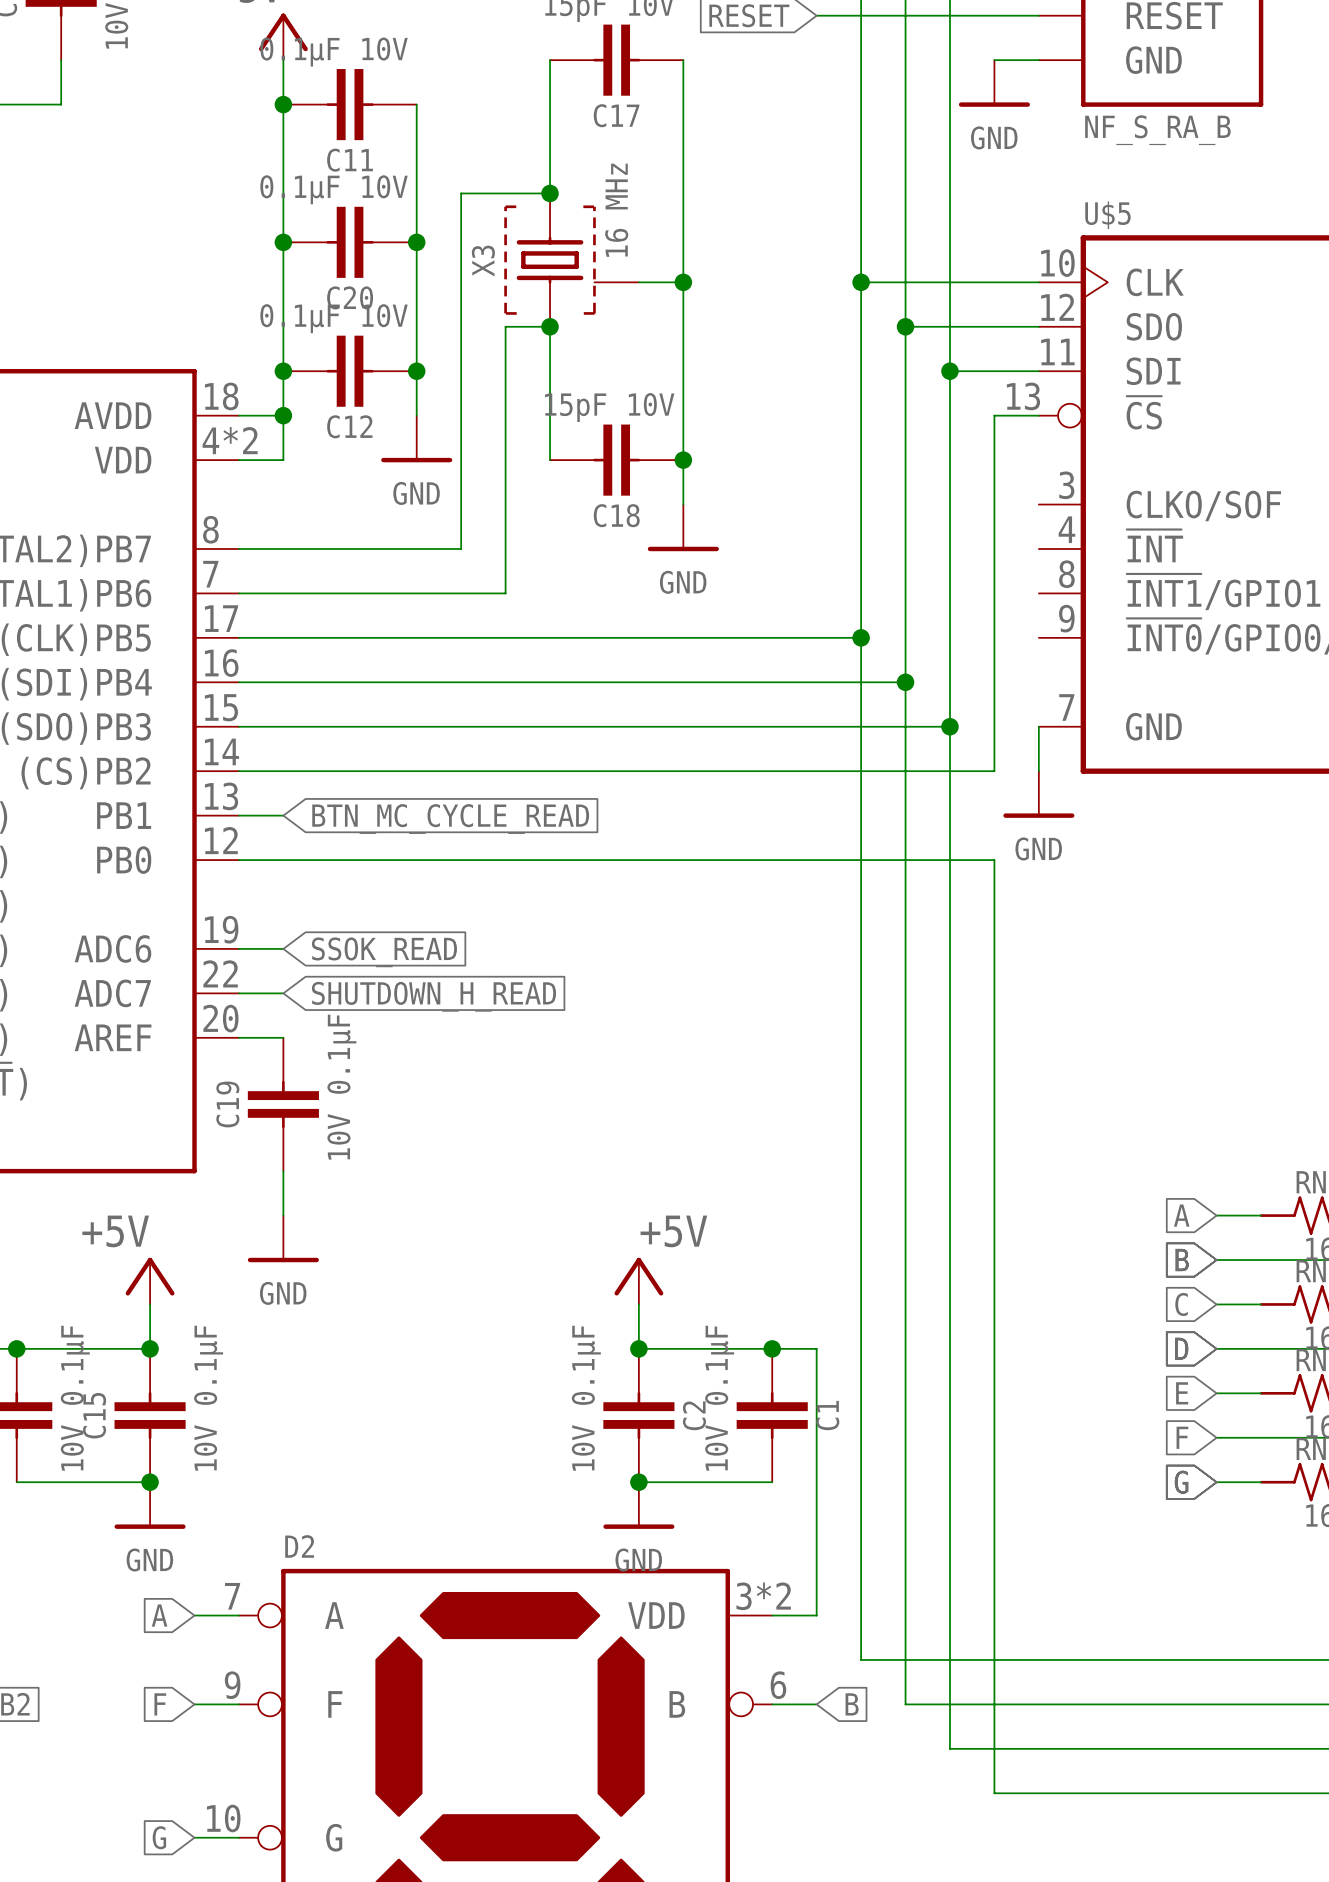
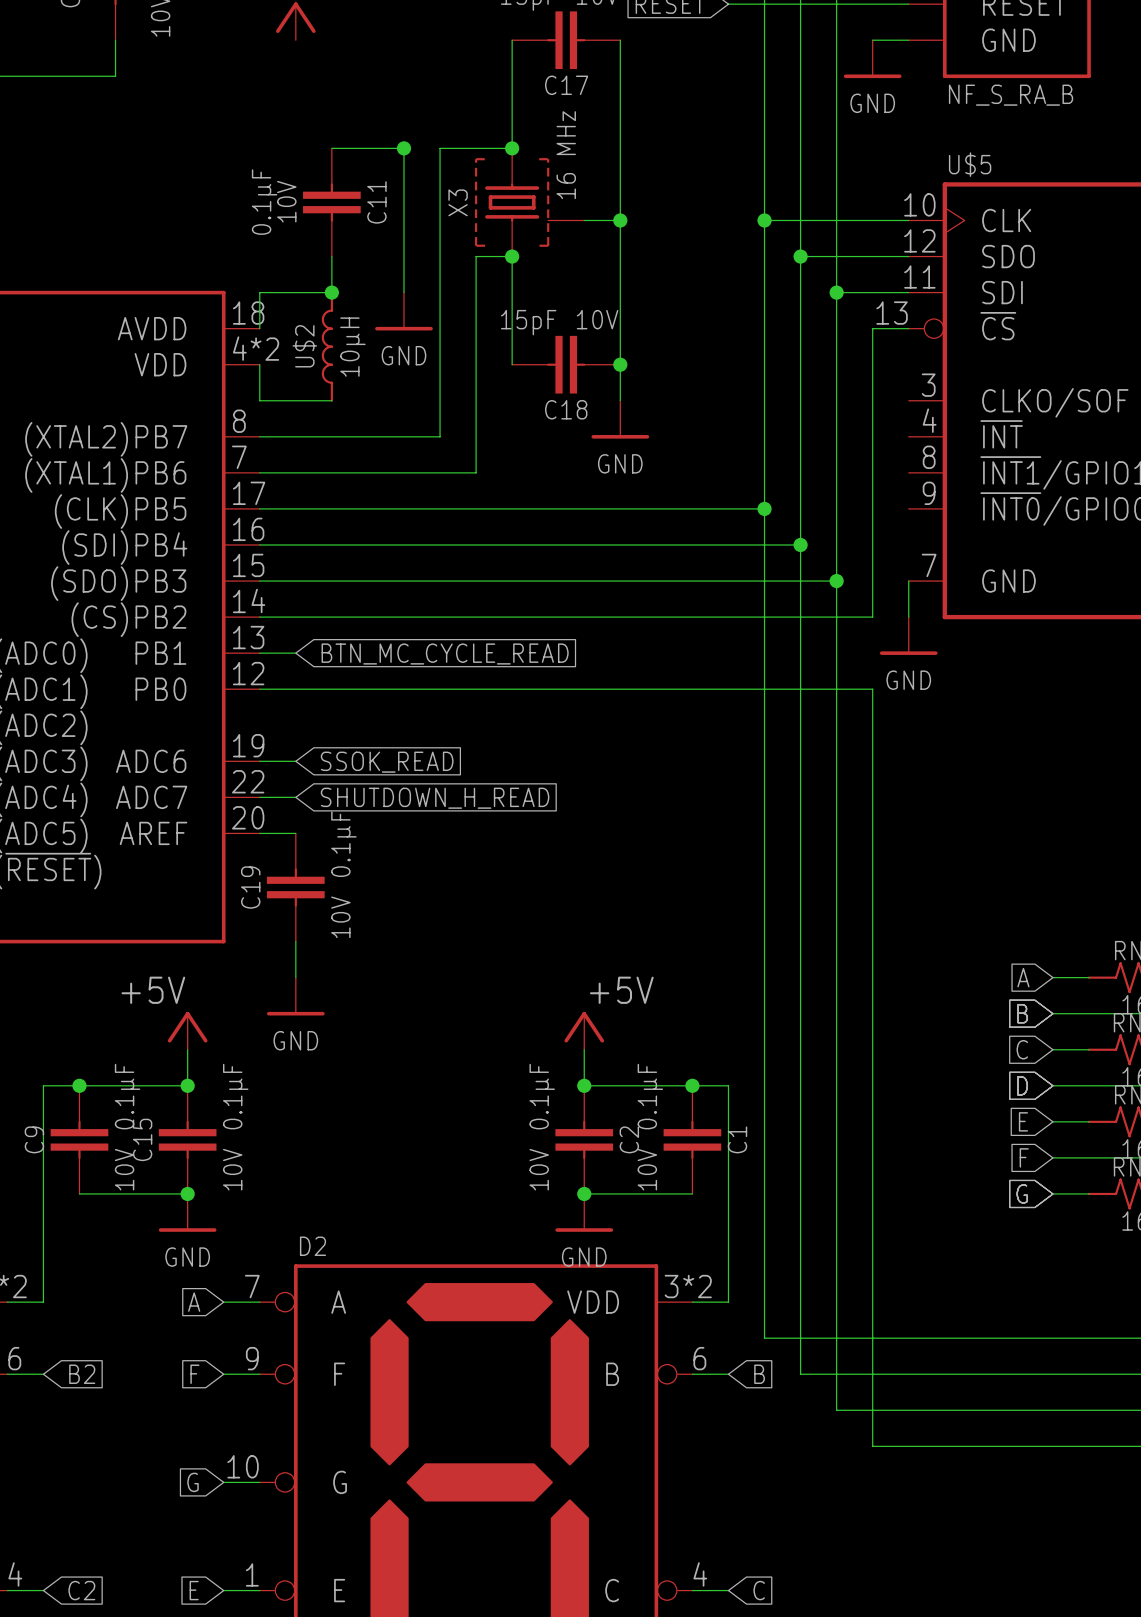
C11 text position: 10V (384, 49) -> 10V (286, 201)
C11 text position: 0.1µF (299, 52) -> 0.1µF (264, 202)
wire: (283, 60) (283, 460) (238, 460) -> (331, 400) (259, 400) (259, 364)
junction: (283, 104) -> none
C11 rotation: 0° (350, 104) -> 90° clockwise (331, 202)
C11 position: (350, 104) -> (331, 202)
wire: (416, 104) (416, 193) -> (331, 148) (403, 148)
C11 name position: C11 (350, 160) -> C11 (376, 202)
junction: (283, 242) -> none
C20: (350, 242) -> none
junction position: (416, 242) -> (403, 148)
junction: (283, 371) -> none
junction: none -> (331, 292)
C12: (350, 371) -> none
junction: (416, 371) -> none
wire: (238, 415) (283, 415) -> (259, 328) (259, 292) (331, 292) (331, 256)
junction: (283, 415) -> none
U$2: none -> (327, 346)
power symbol position: GND (416, 438) -> GND (403, 311)

